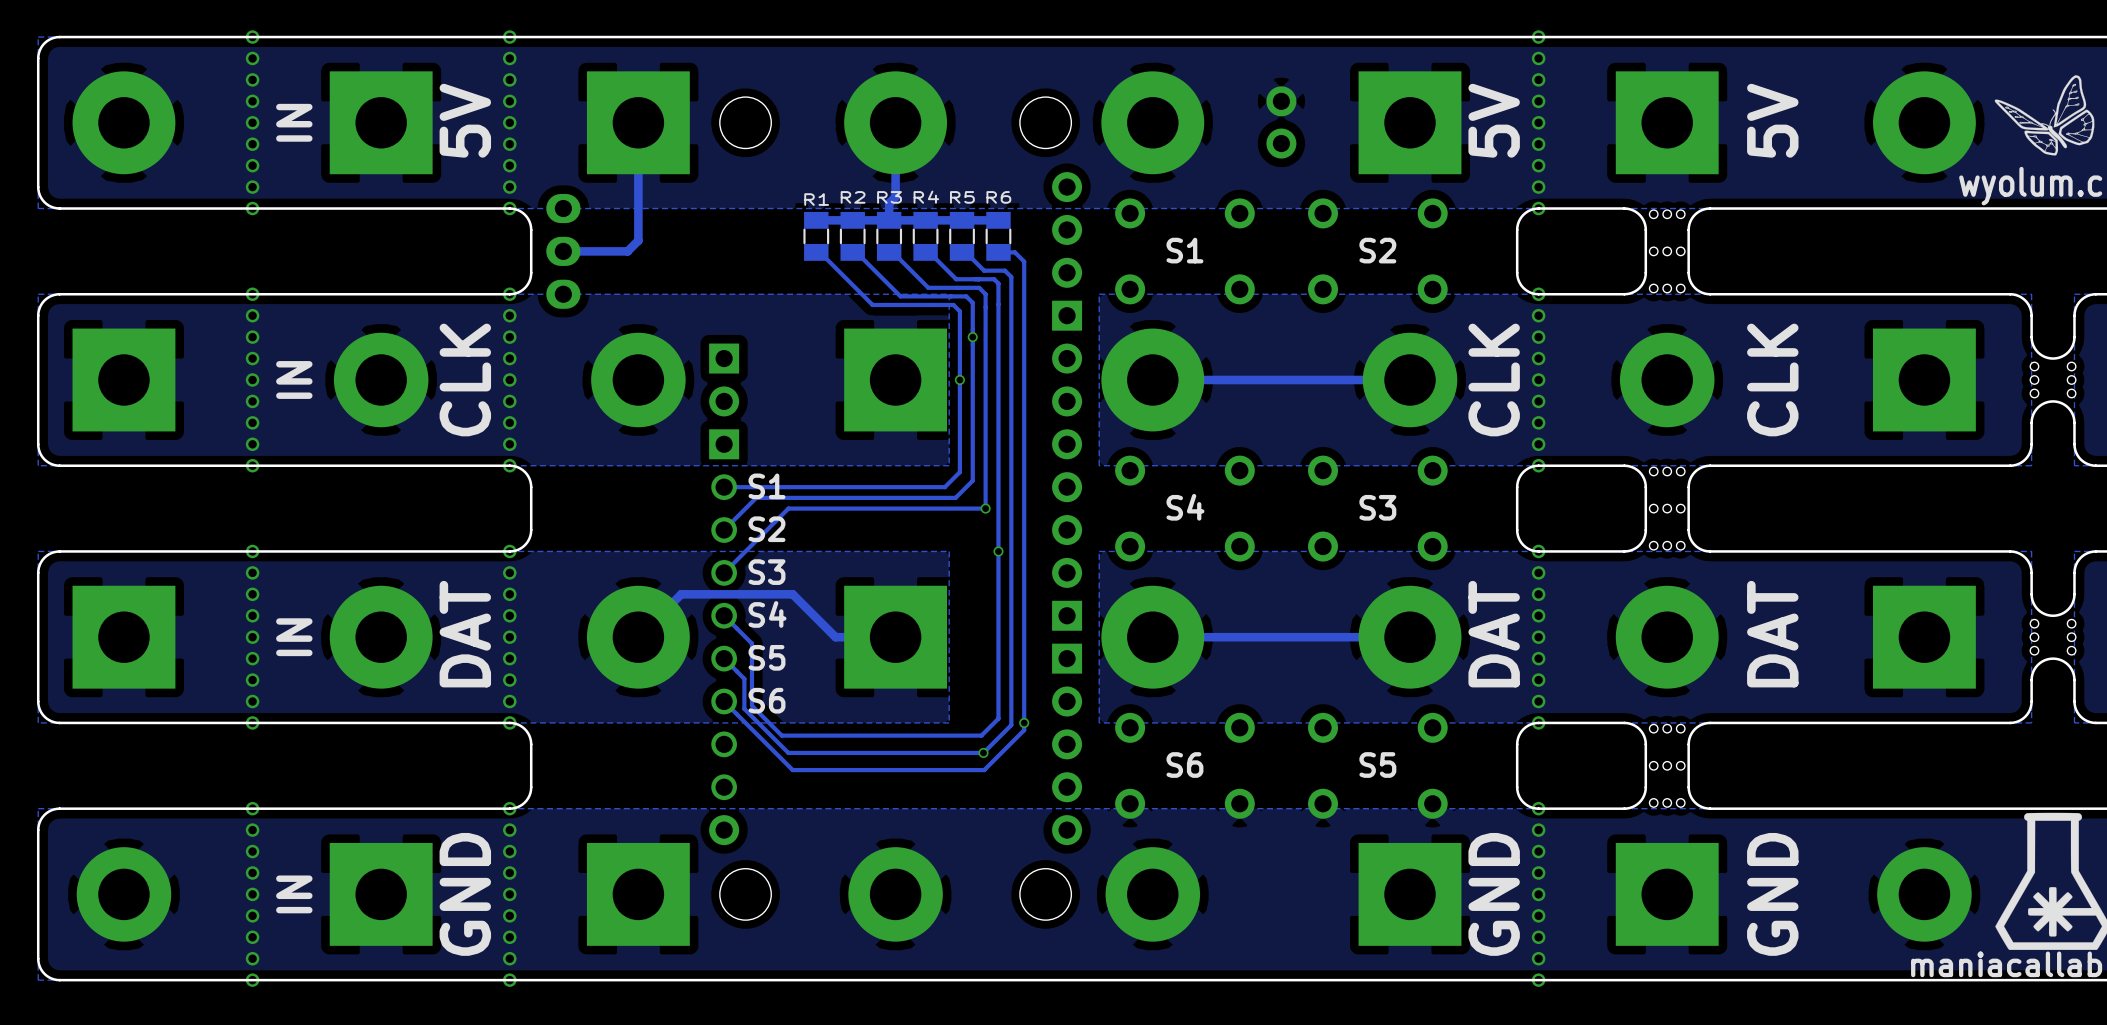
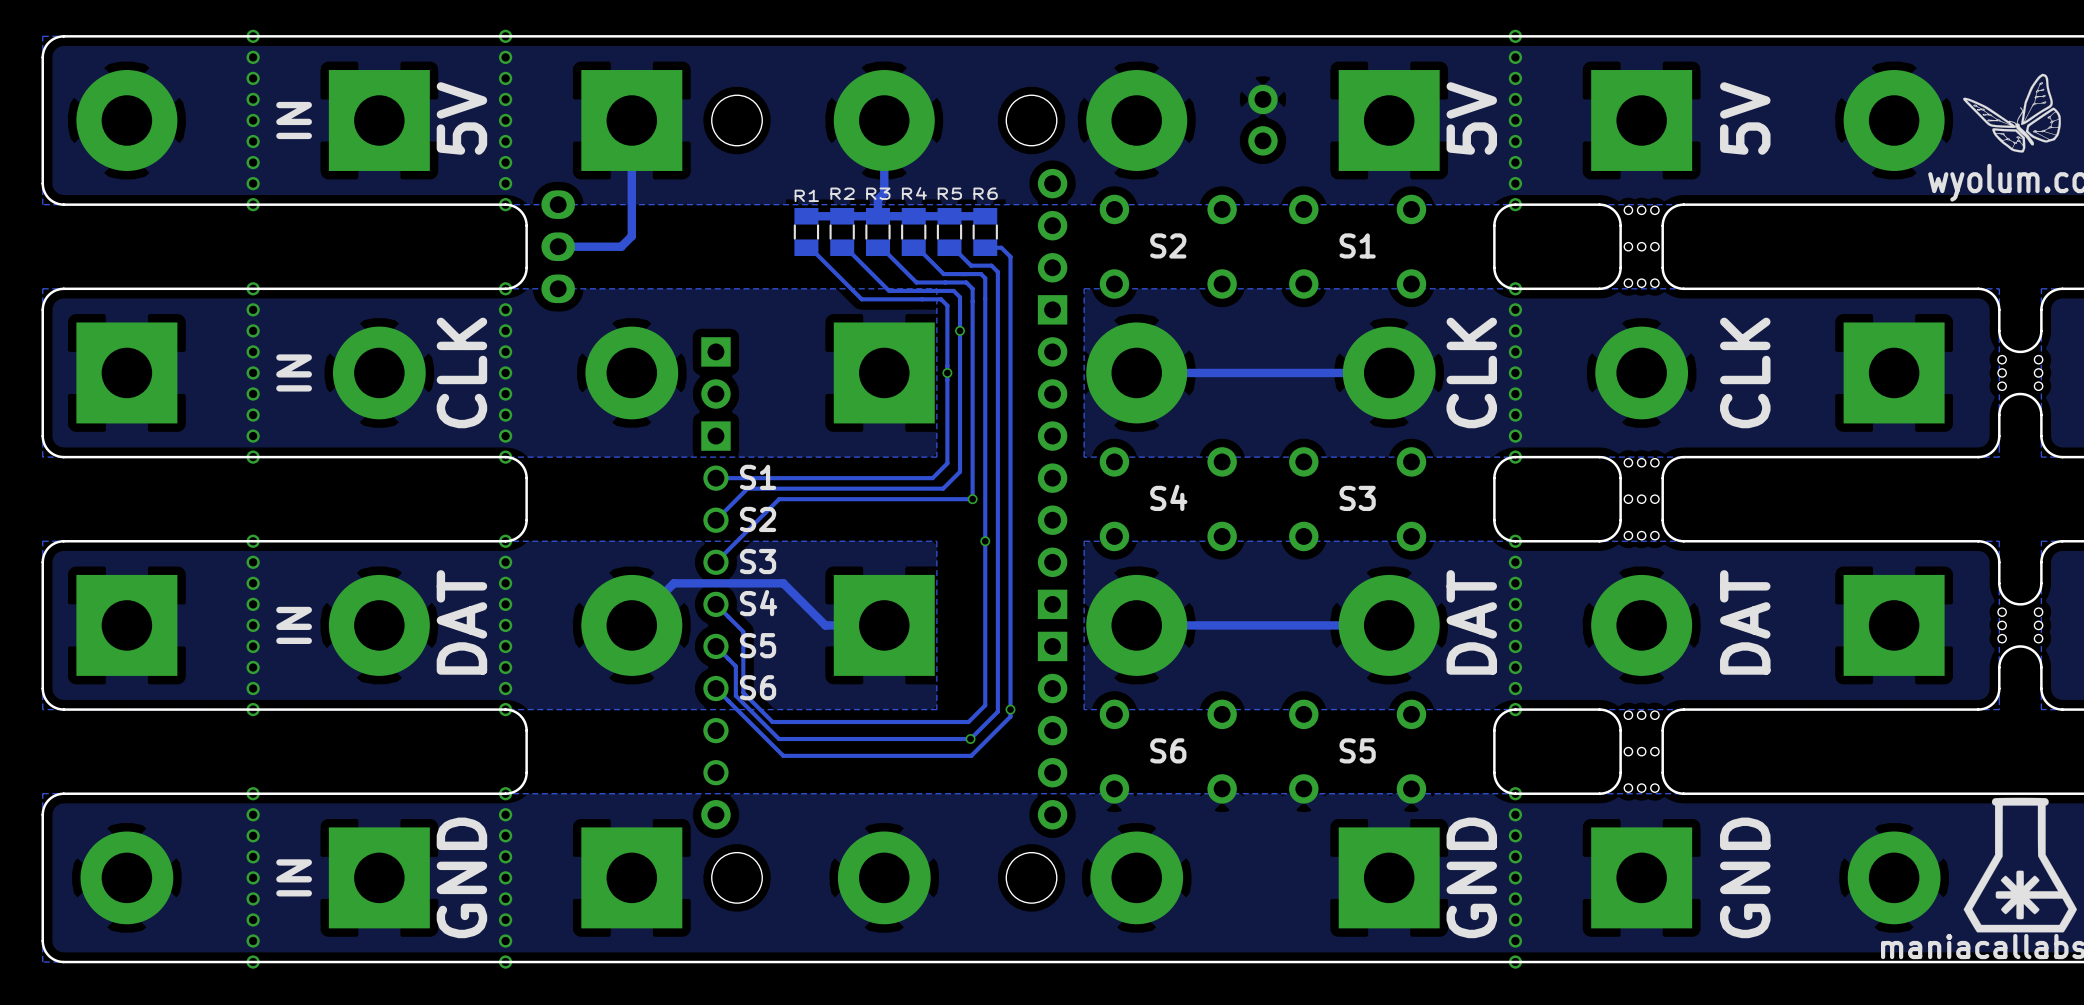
text: S1 (1184, 250) -> S2 (1168, 245)
text: S2 (1377, 250) -> S1 (1357, 245)

